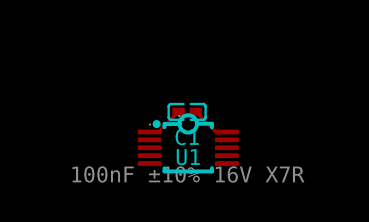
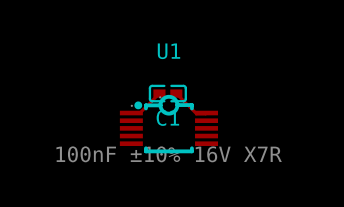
U1 name position: U1 (188, 157) -> U1 (168, 51)

